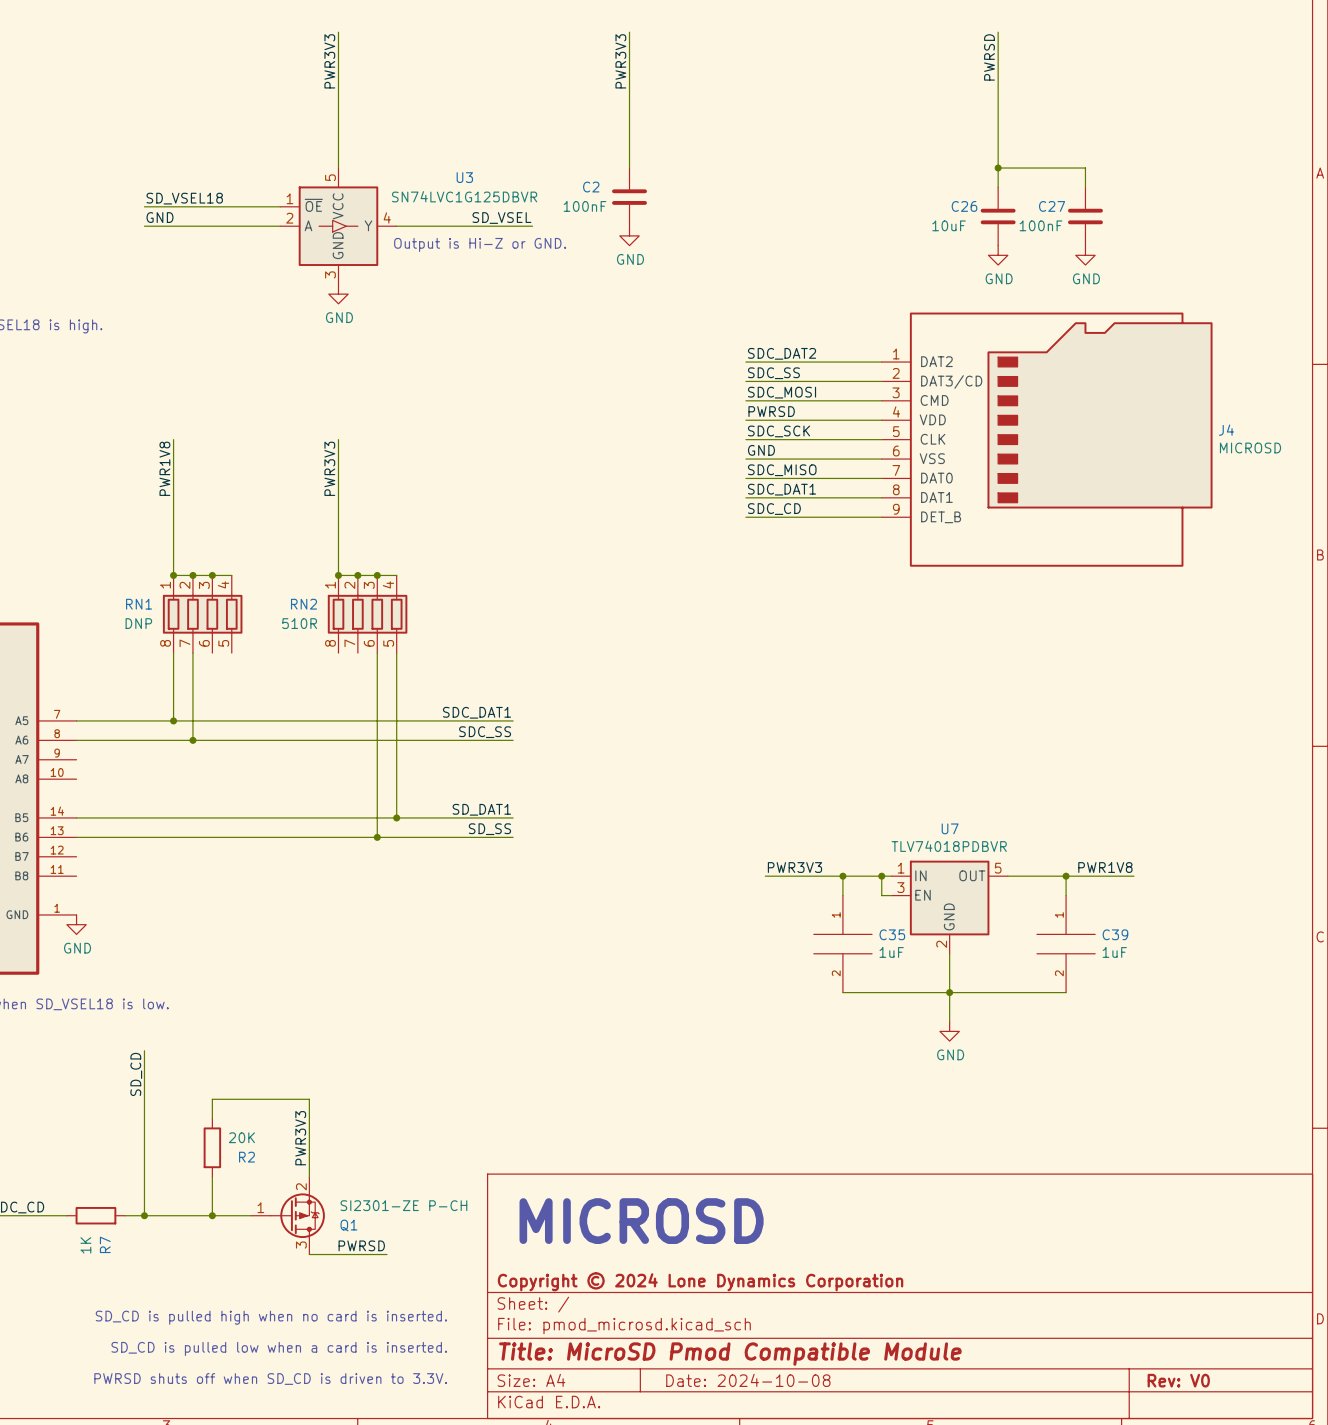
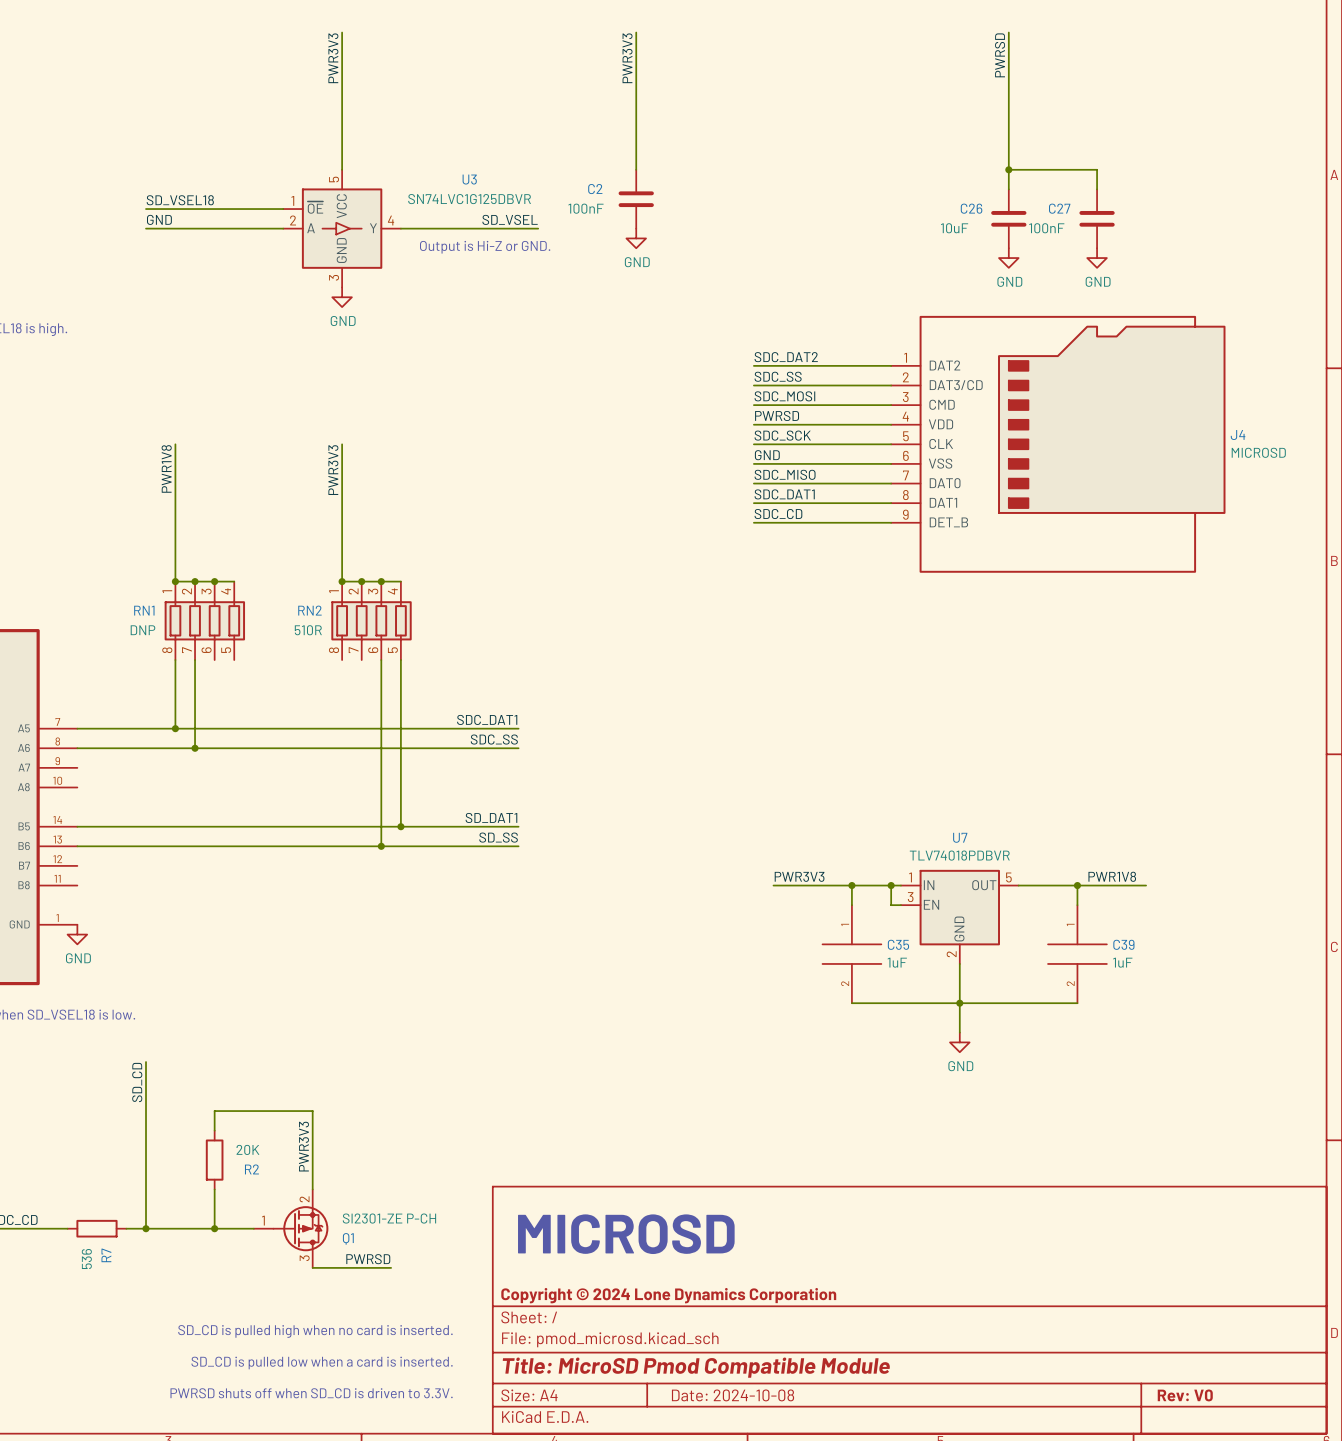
R7 value: 1K (85, 1245) -> 536 (86, 1259)

